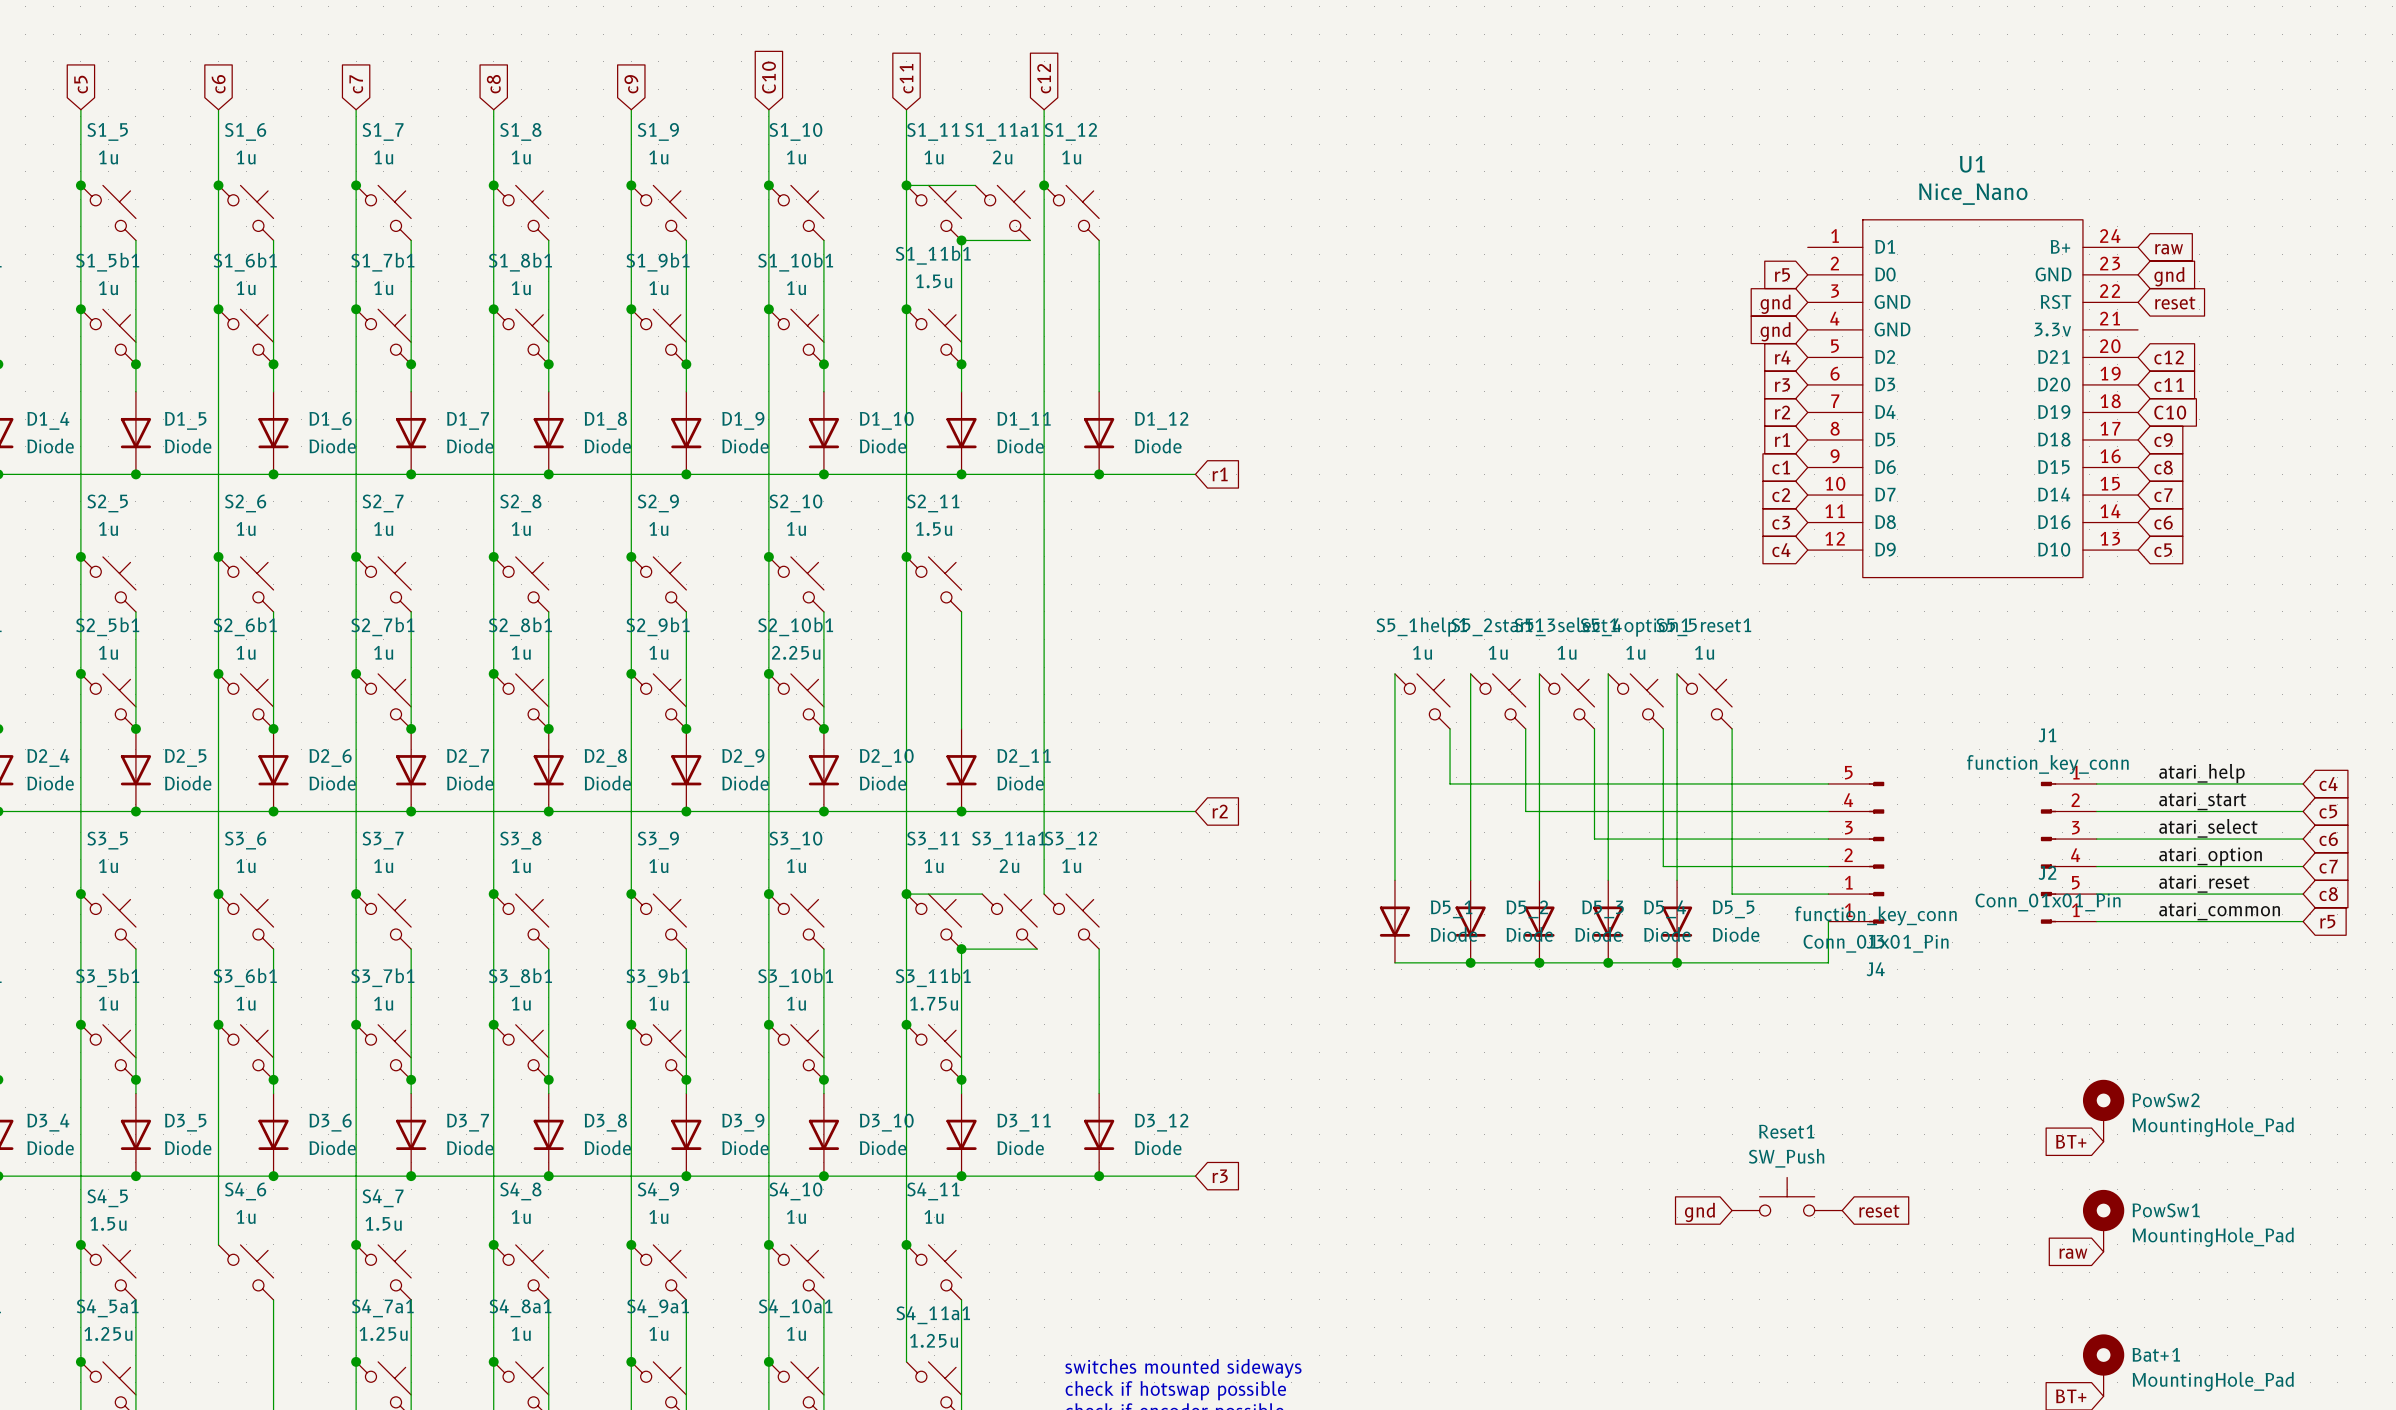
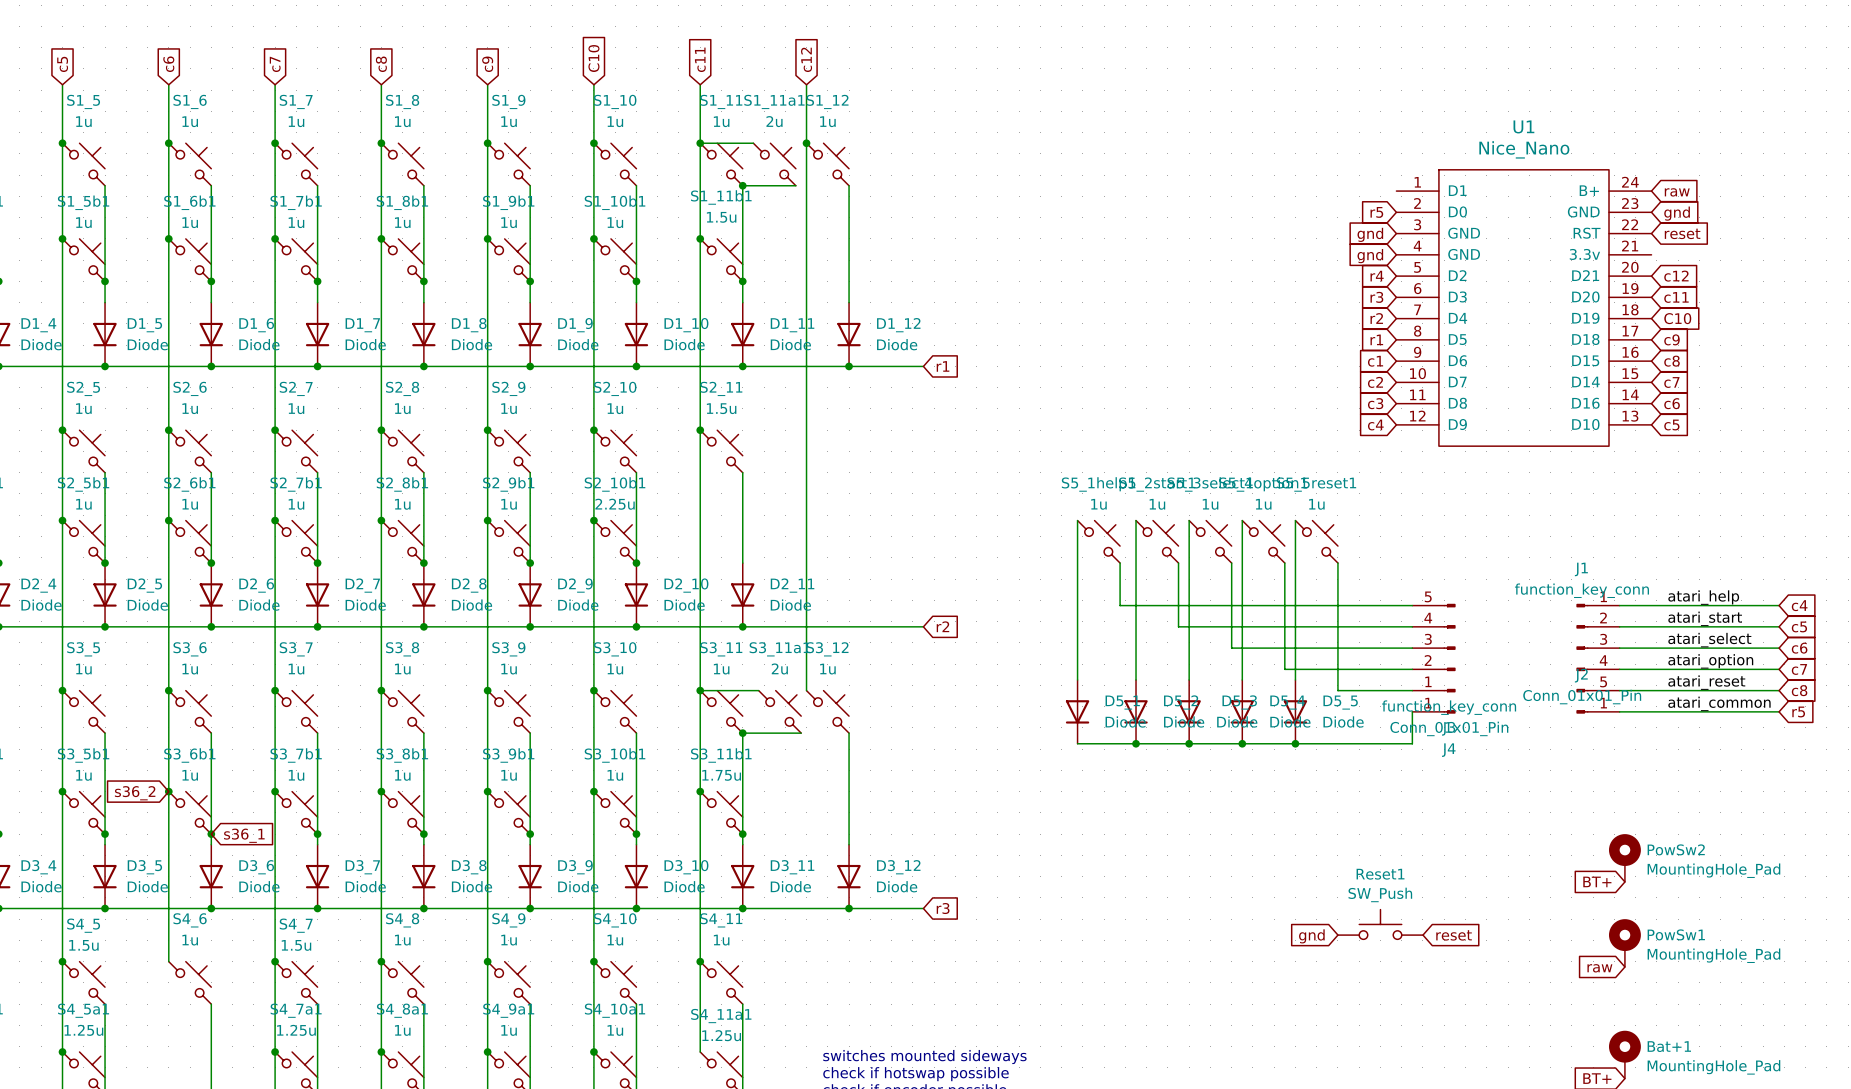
global label: none -> s36_2 (135, 793)
global label: none -> s36_1 (244, 835)

